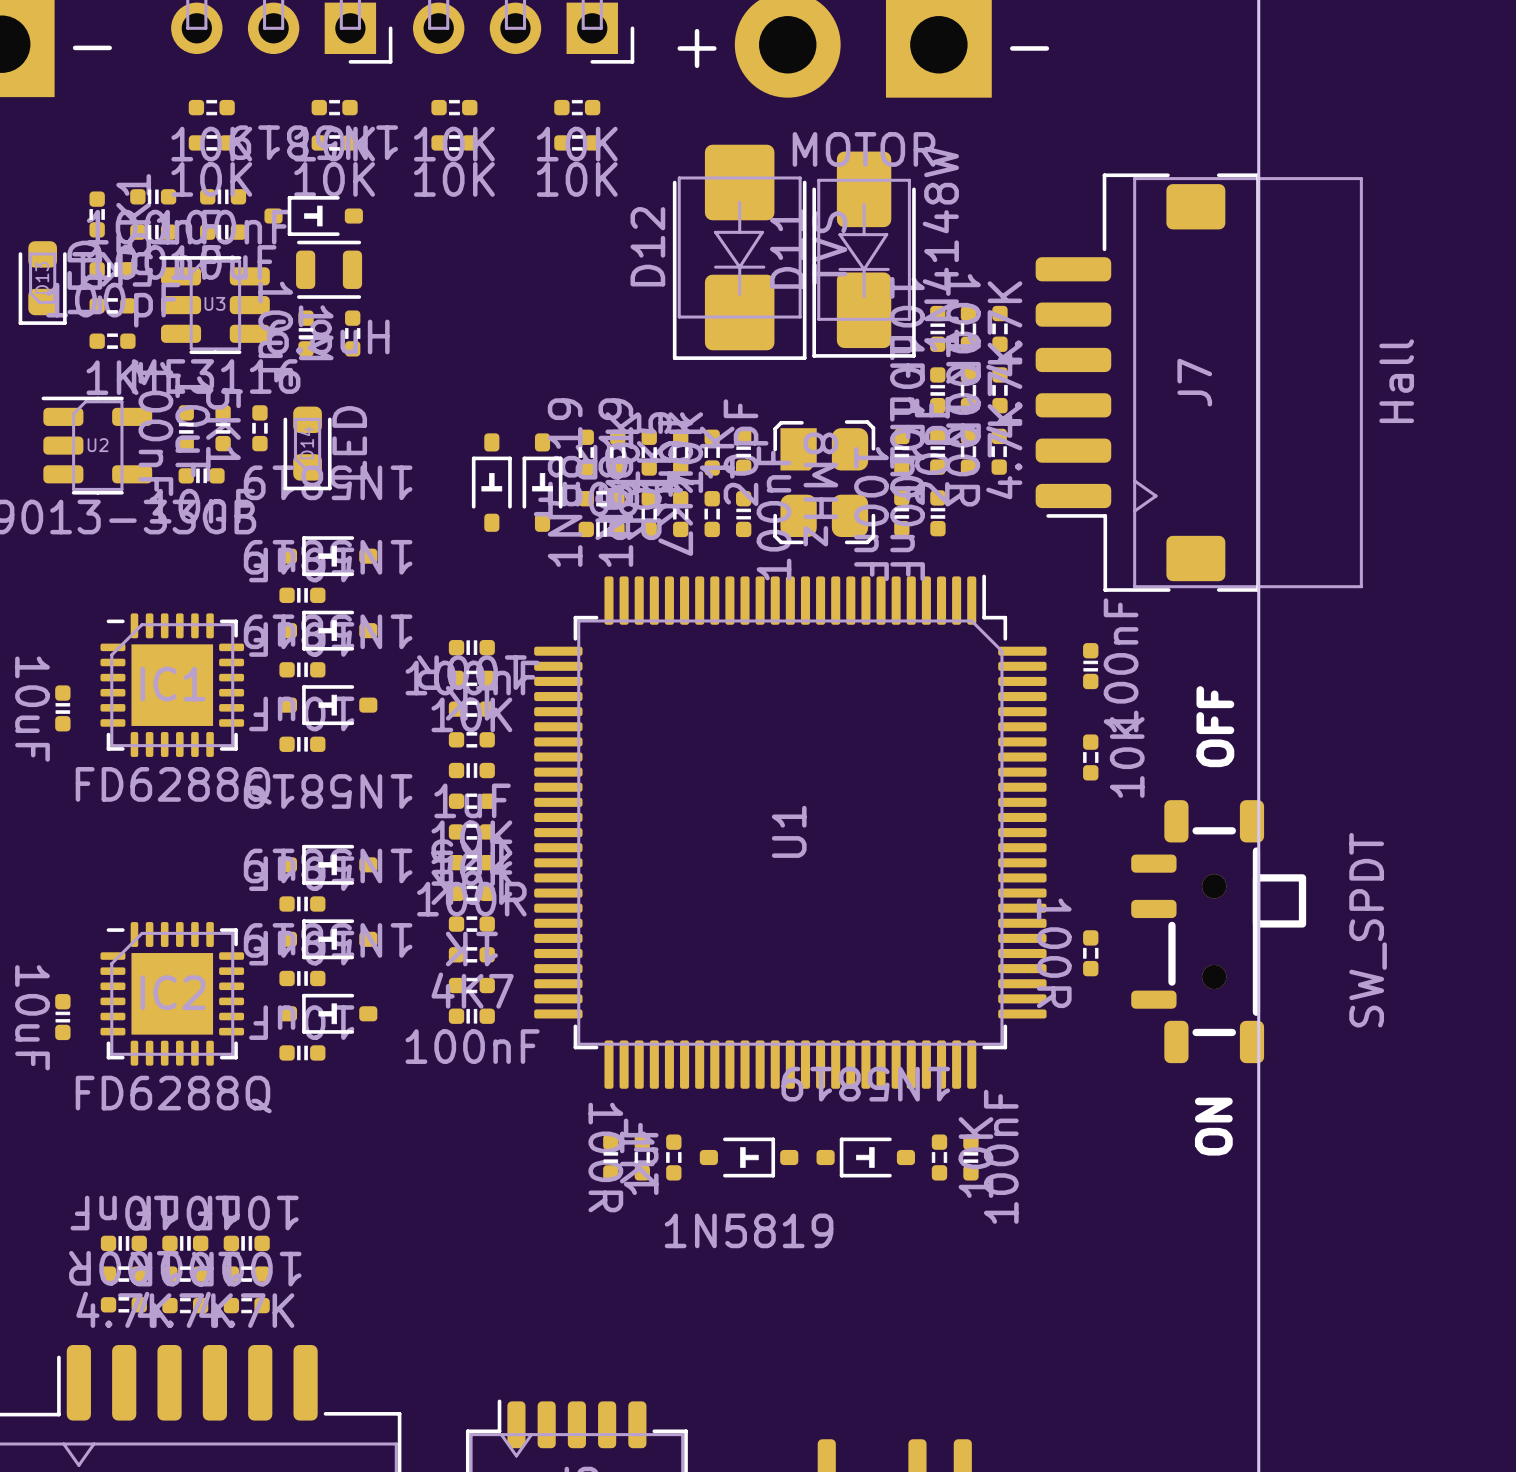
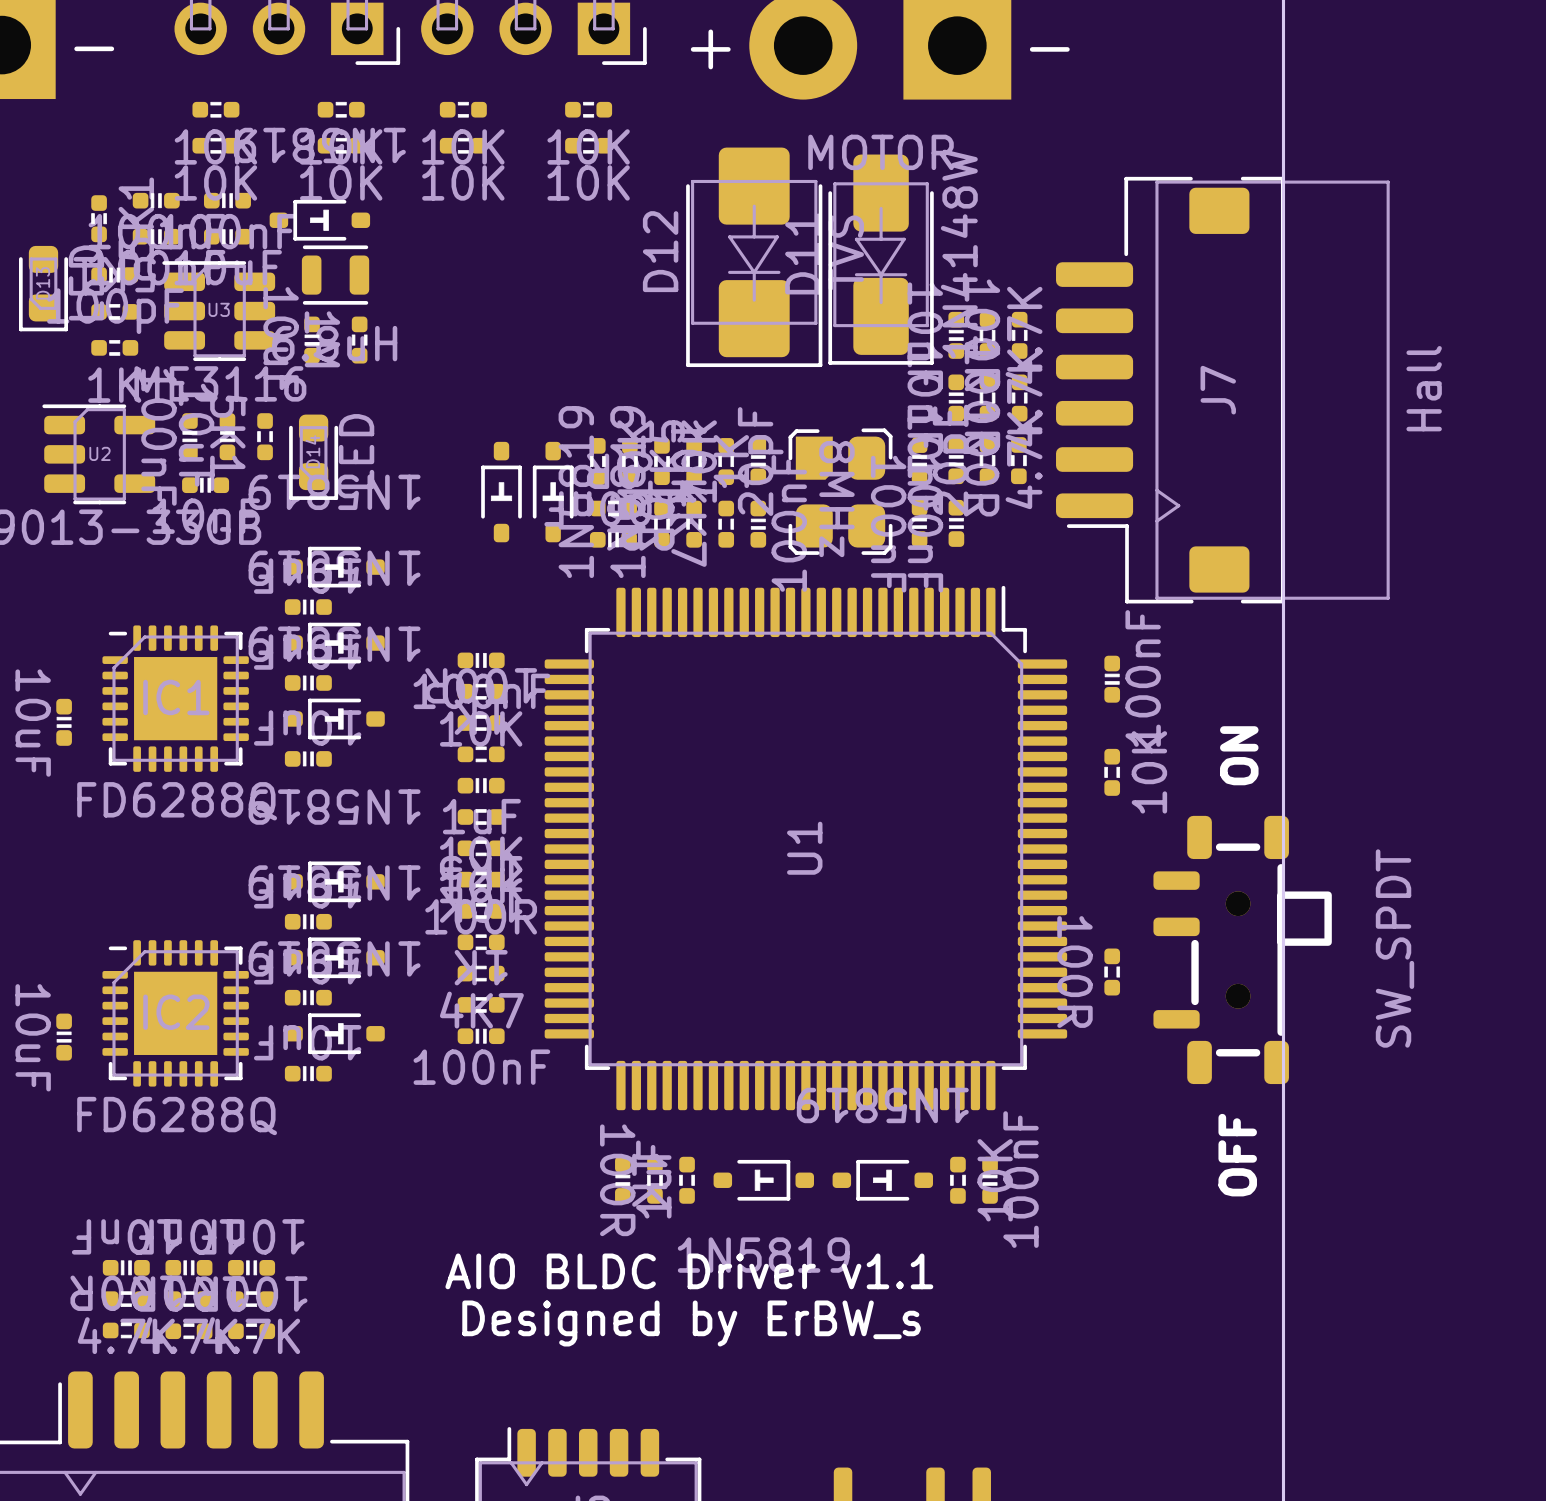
text: OFF (1215, 726) -> ON (1239, 755)
text: ON (1213, 1126) -> OFF (1237, 1155)
text: none -> AIO BLDC Driver v1.1 (689, 1271)
text: none -> Designed by ErBW_s (691, 1323)

